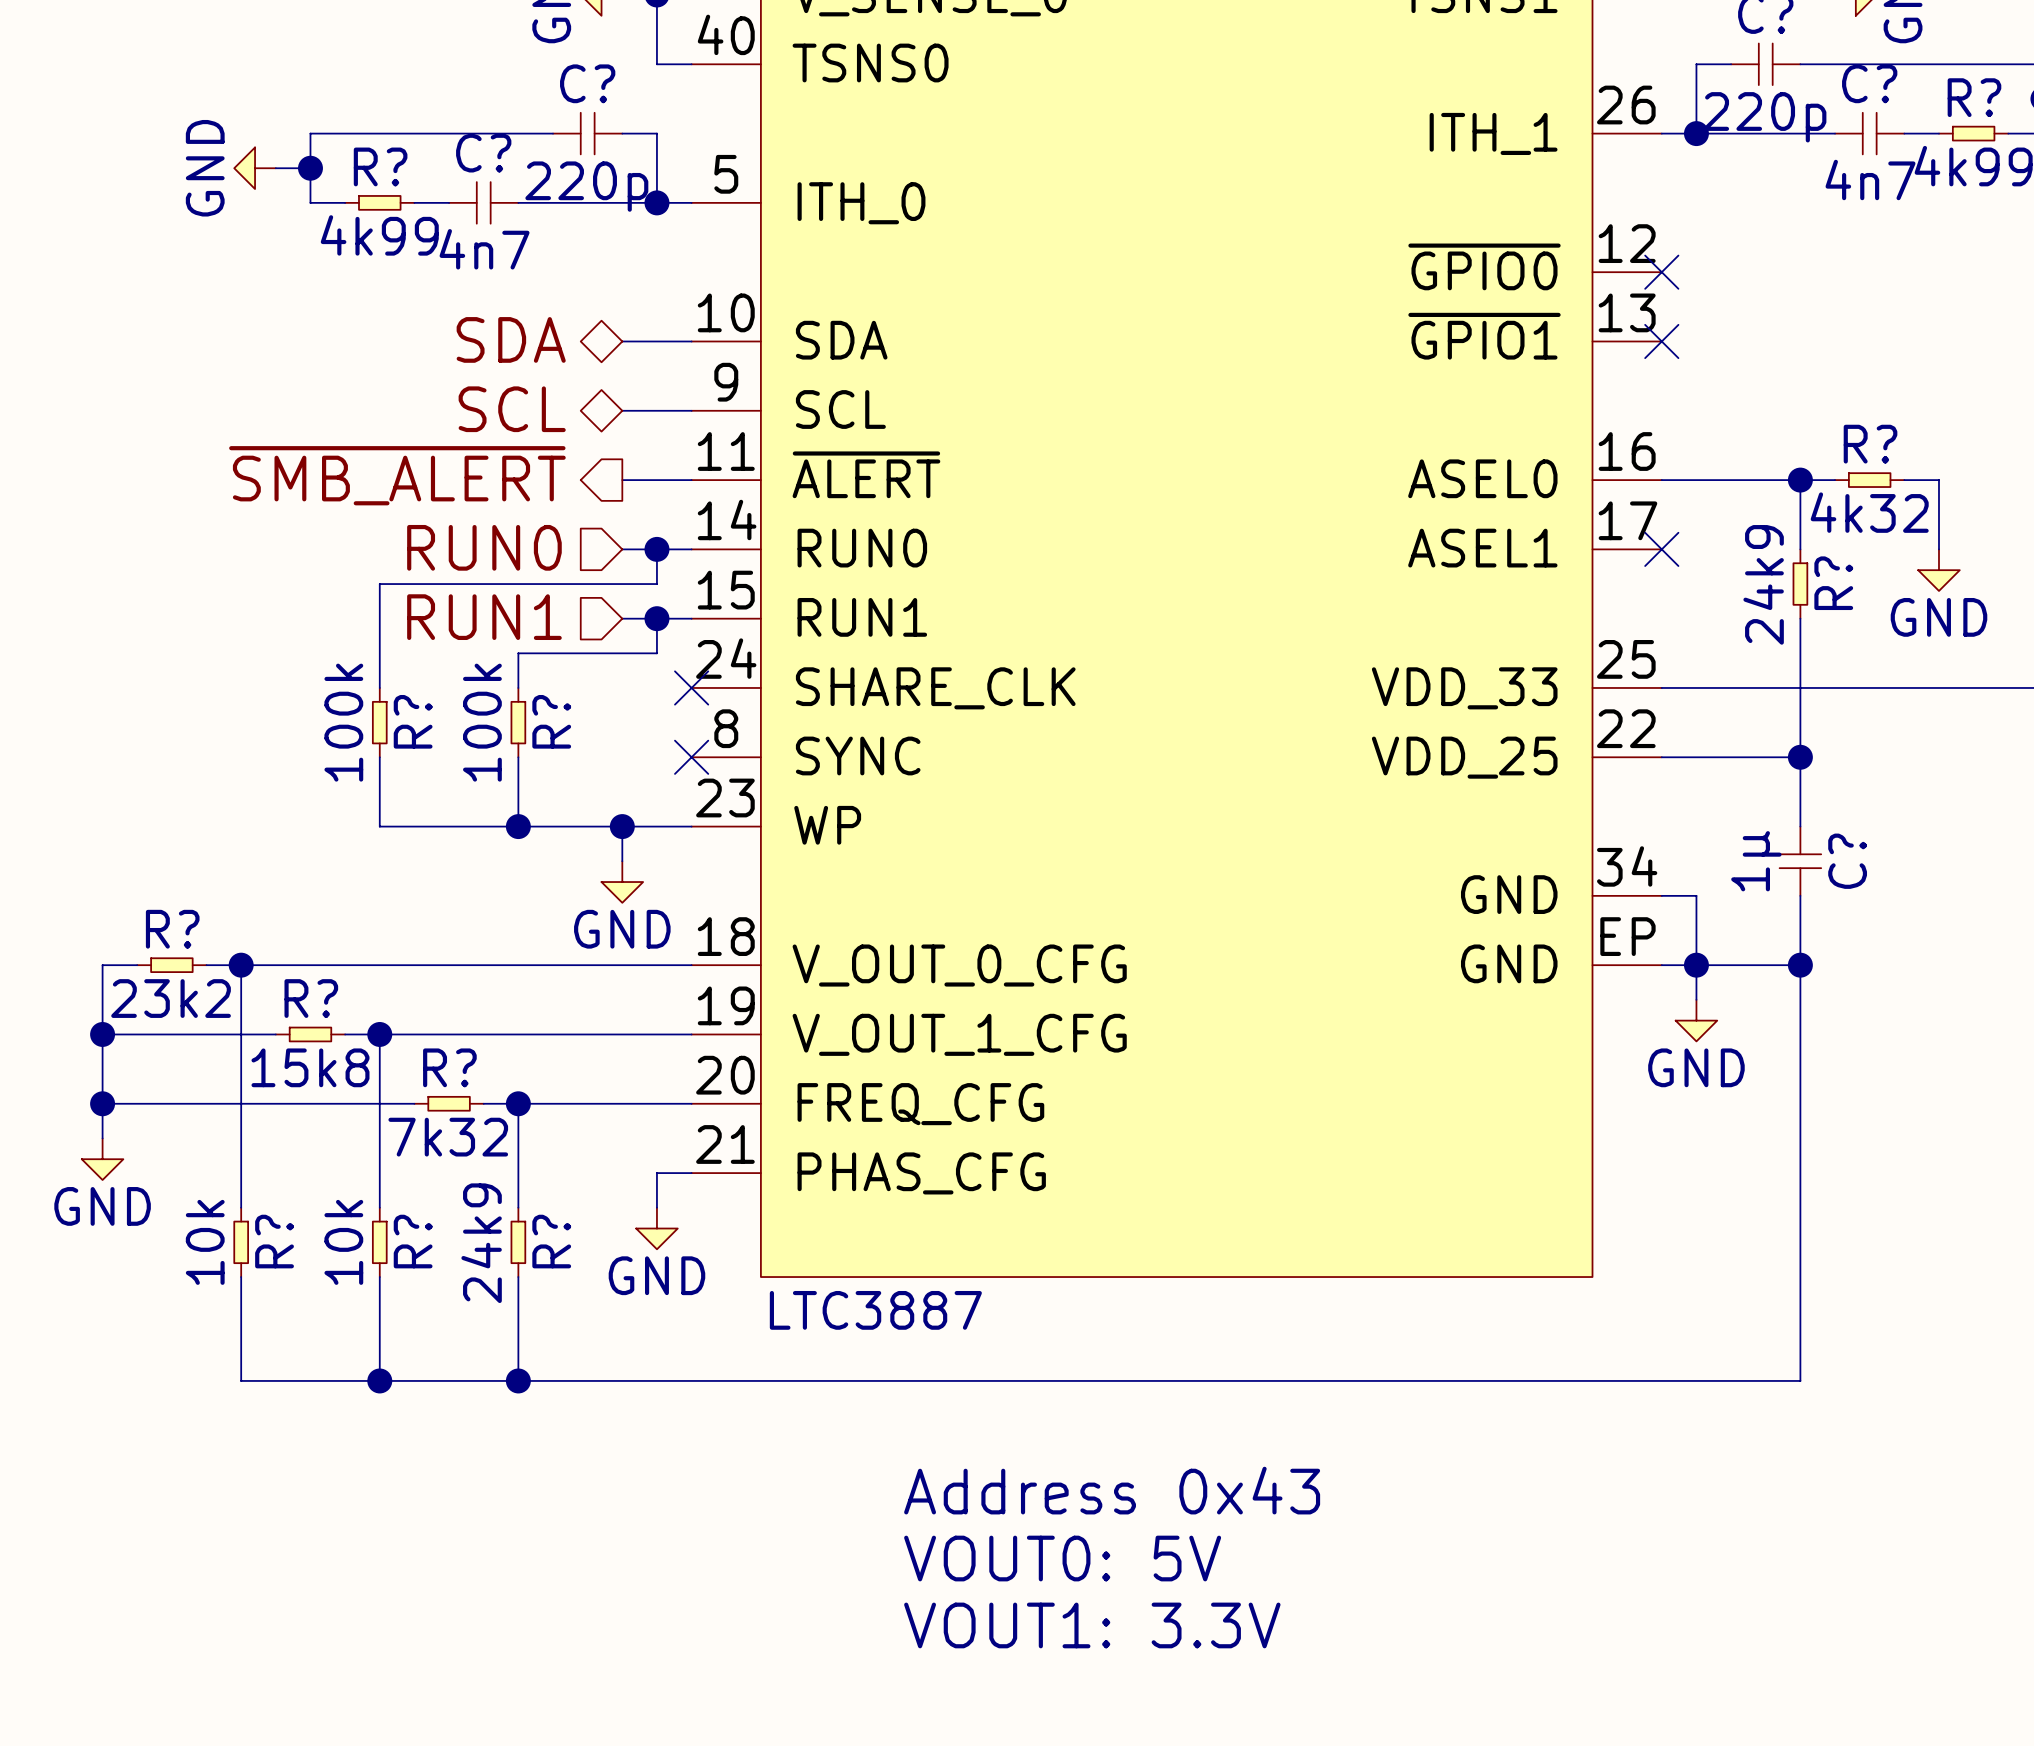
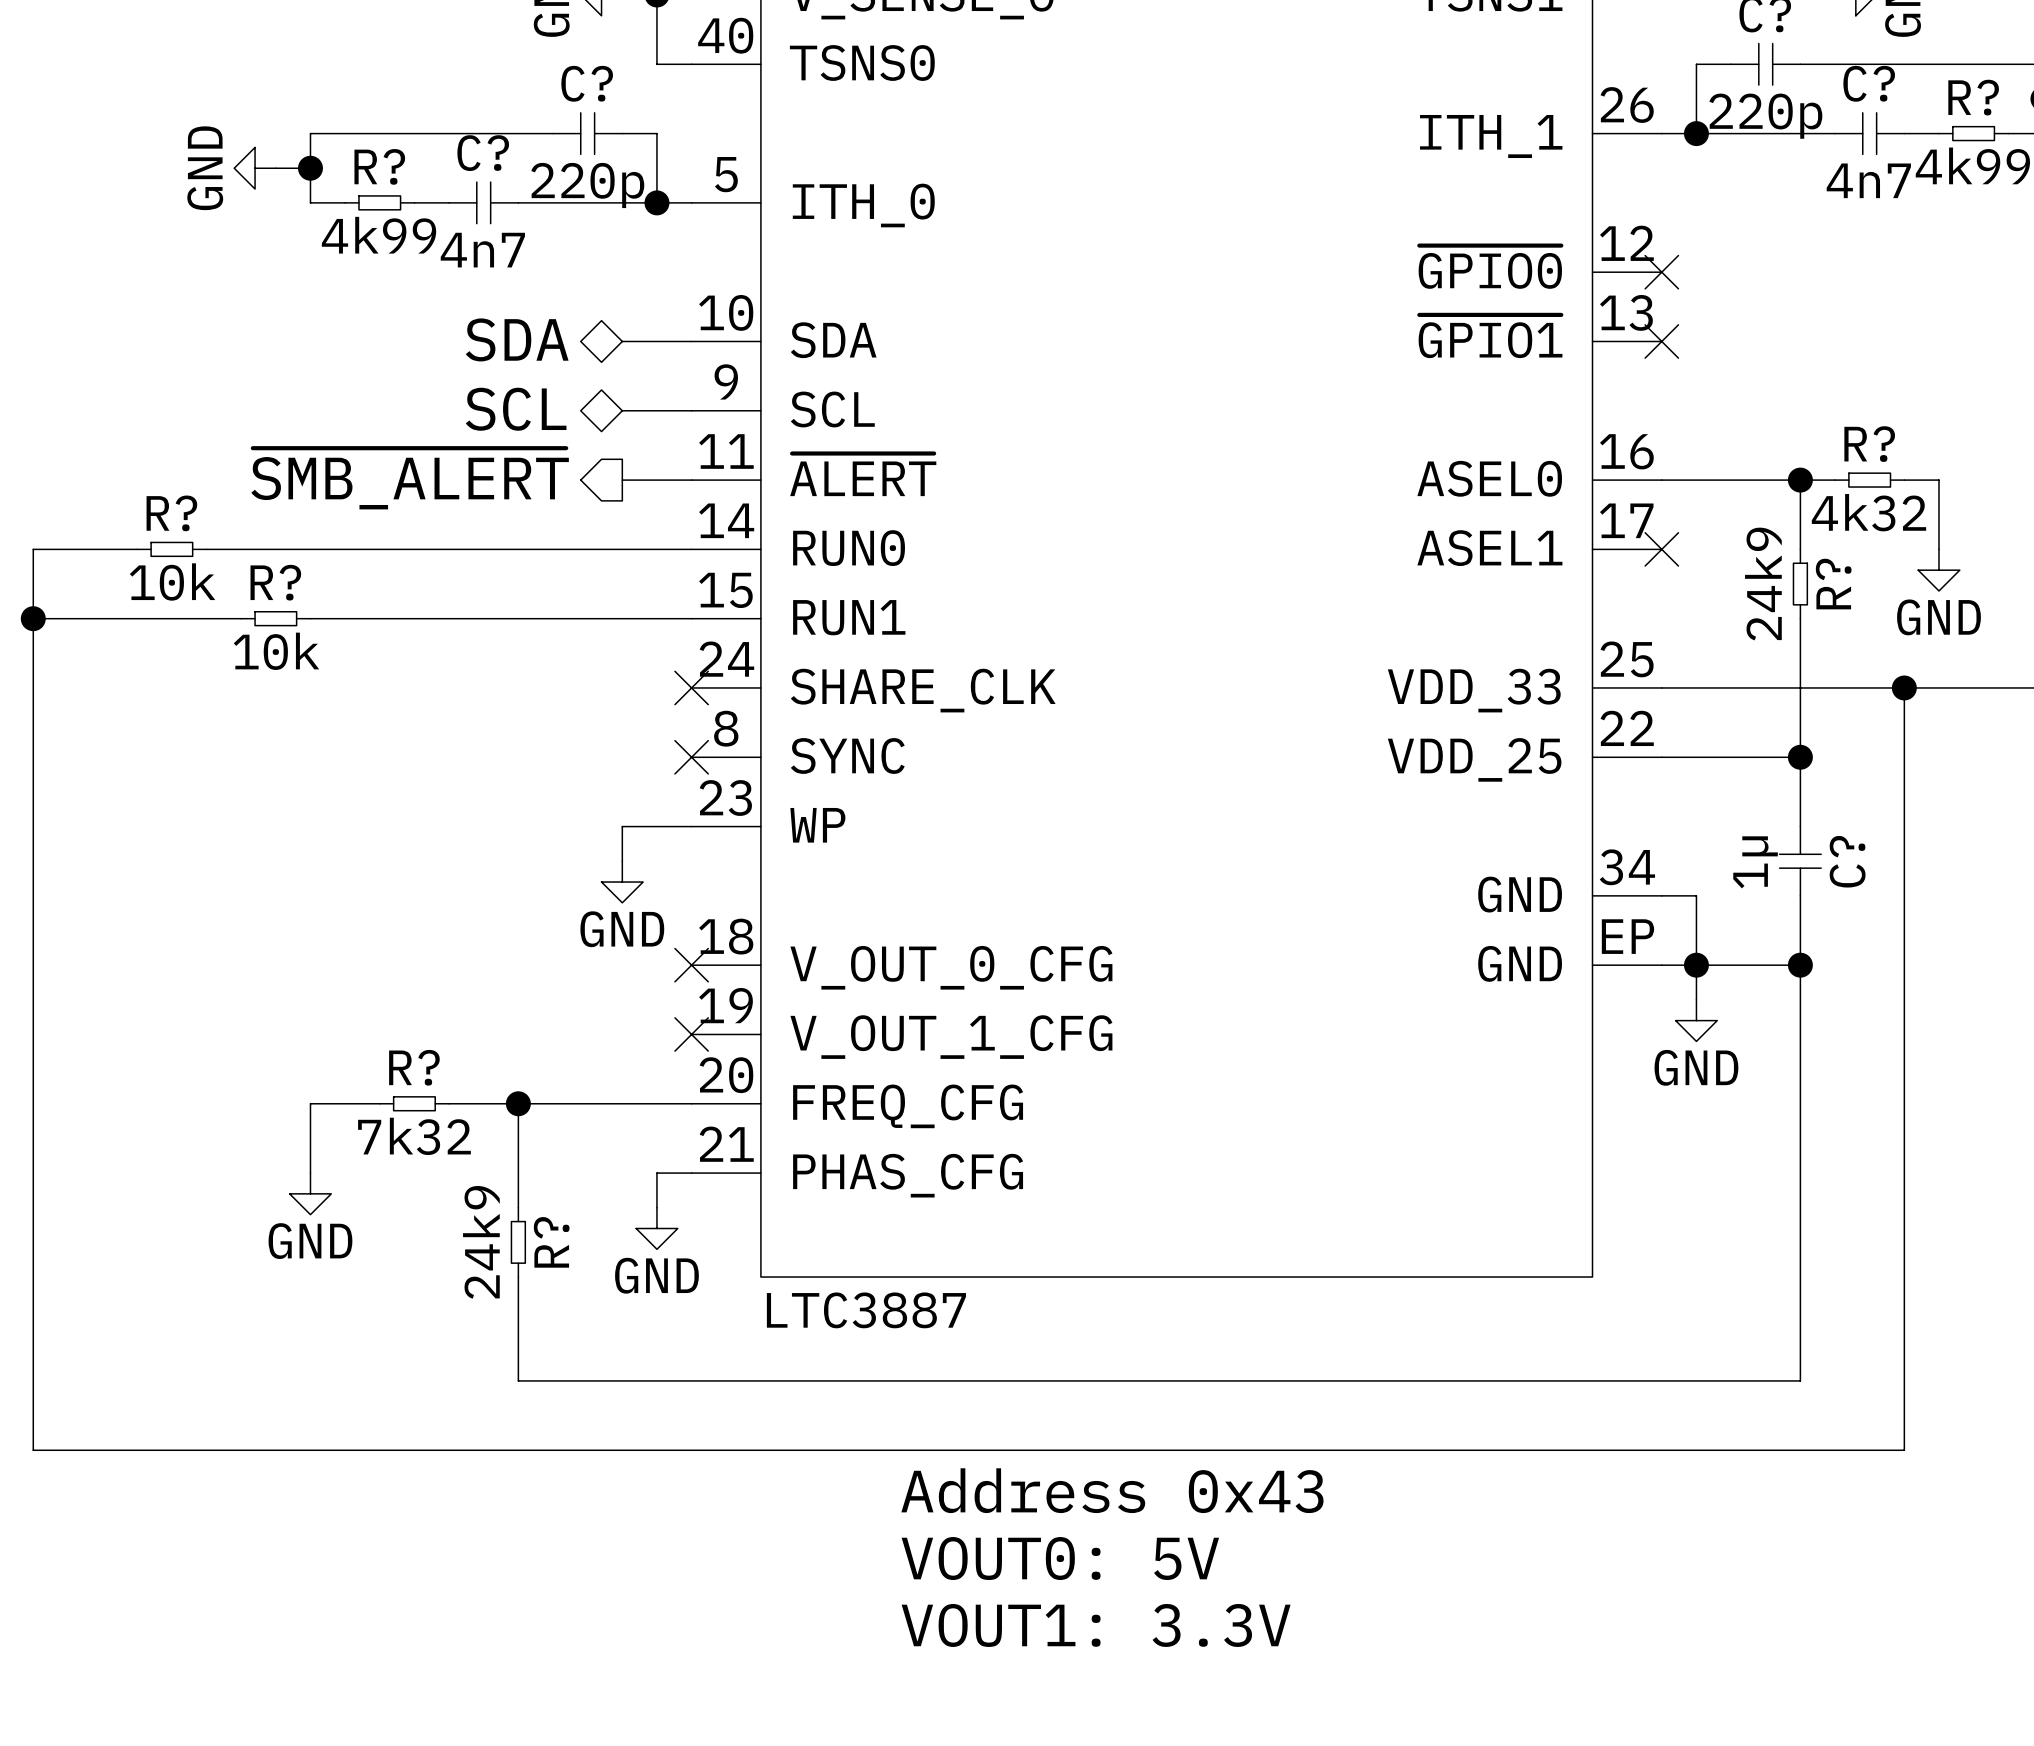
hierarchical label: RUN0 (484, 547) -> none
wire: none -> (137, 549) (33, 549) (33, 1450) (1904, 1450) (1904, 687)
R?: none -> 10k (171, 549)
wire: none -> (206, 549) (622, 549)
wire: (656, 549) (656, 584) (379, 584) (379, 687) -> none
junction: (656, 549) -> none
hierarchical label: RUN1 (484, 617) -> none
wire: none -> (33, 618) (241, 618)
junction: none -> (33, 618)
R?: none -> 10k (275, 618)
wire: none -> (310, 618) (622, 618)
wire: (656, 618) (656, 653) (518, 653) (518, 687) -> none
junction: (656, 618) -> none
junction: none -> (1904, 687)
R?: 100k (379, 722) -> none
R?: 100k (518, 722) -> none
wire: (379, 757) (379, 826) (622, 826) -> none
wire: (518, 757) (518, 826) -> none
junction: (518, 826) -> none
junction: (622, 826) -> none
wire: (137, 965) (102, 965) (102, 1138) -> none
R?: 23k2 (171, 965) -> none
wire: (206, 965) (691, 965) -> none
wire: (241, 965) (241, 1207) -> none
junction: (241, 965) -> none
no-connect mark: none -> (691, 965)
wire: (102, 1034) (275, 1034) -> none
junction: (102, 1034) -> none
R?: 15k8 (310, 1034) -> none
wire: (345, 1034) (691, 1034) -> none
wire: (379, 1034) (379, 1207) -> none
junction: (379, 1034) -> none
no-connect mark: none -> (691, 1034)
wire: (102, 1103) (310, 1103) -> (310, 1173) (310, 1103)
junction: (102, 1103) -> none
R? position: (449, 1103) -> (414, 1103)
power symbol position: GND (102, 1159) -> GND (310, 1193)
R?: 10k (241, 1242) -> none
R?: 10k (379, 1242) -> none
wire: (241, 1277) (241, 1380) (518, 1380) -> none
wire: (379, 1277) (379, 1380) -> none
junction: (379, 1380) -> none
junction: (518, 1380) -> none

